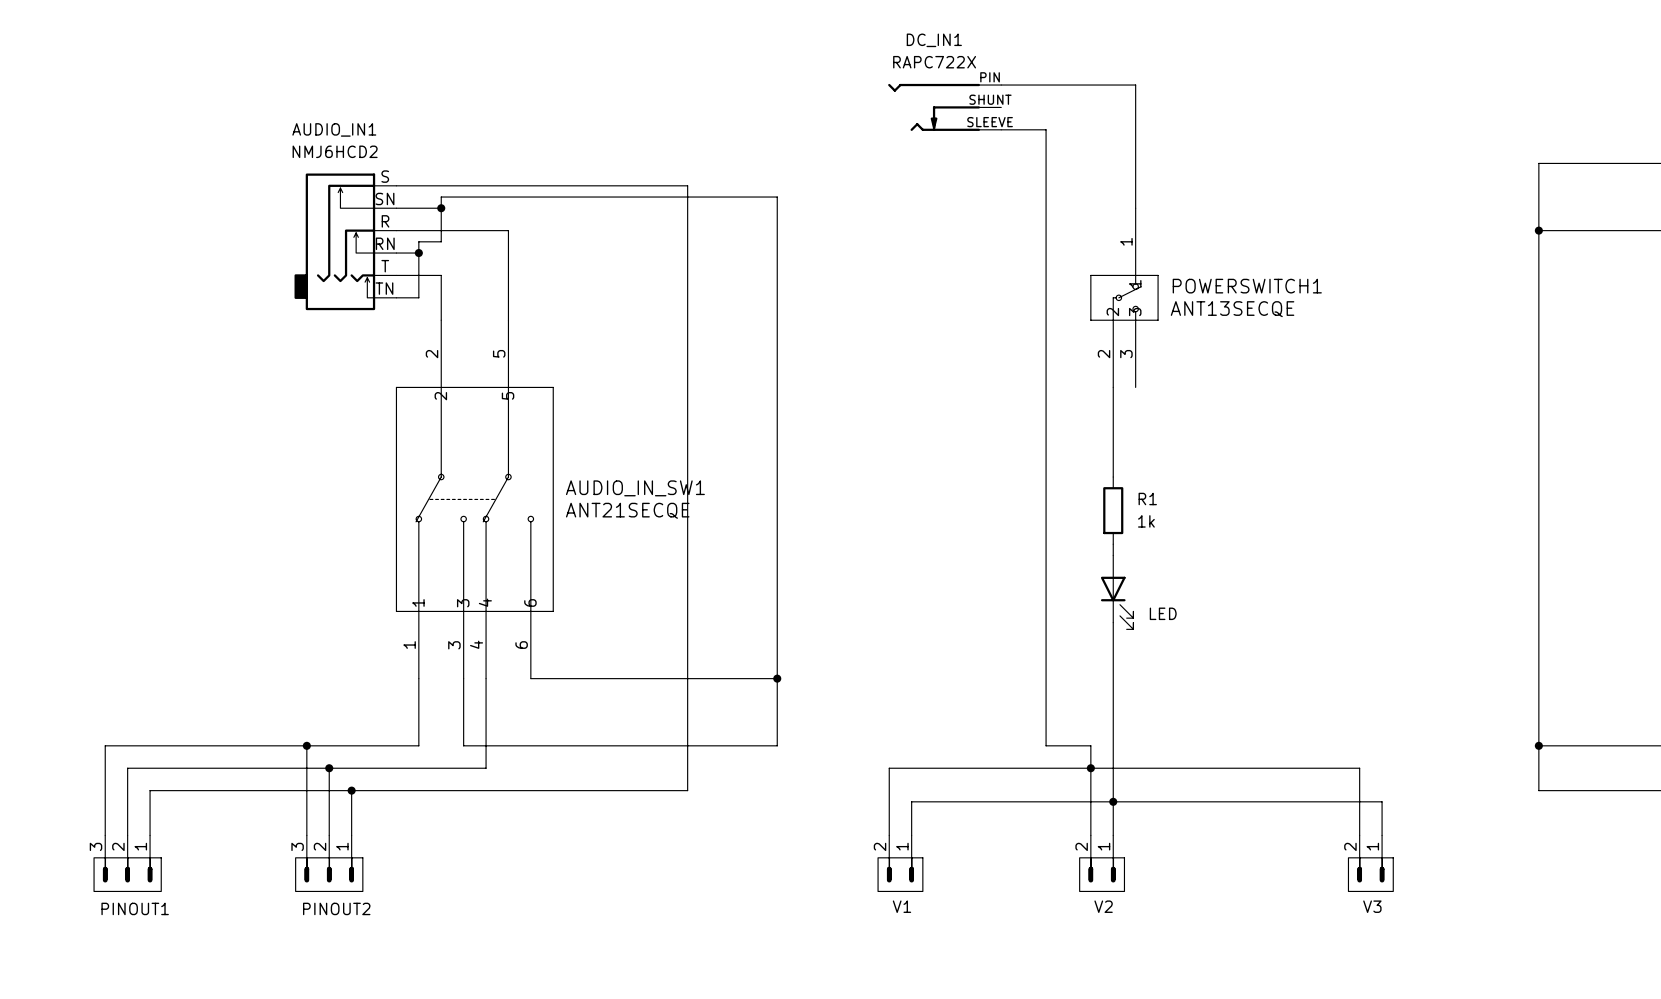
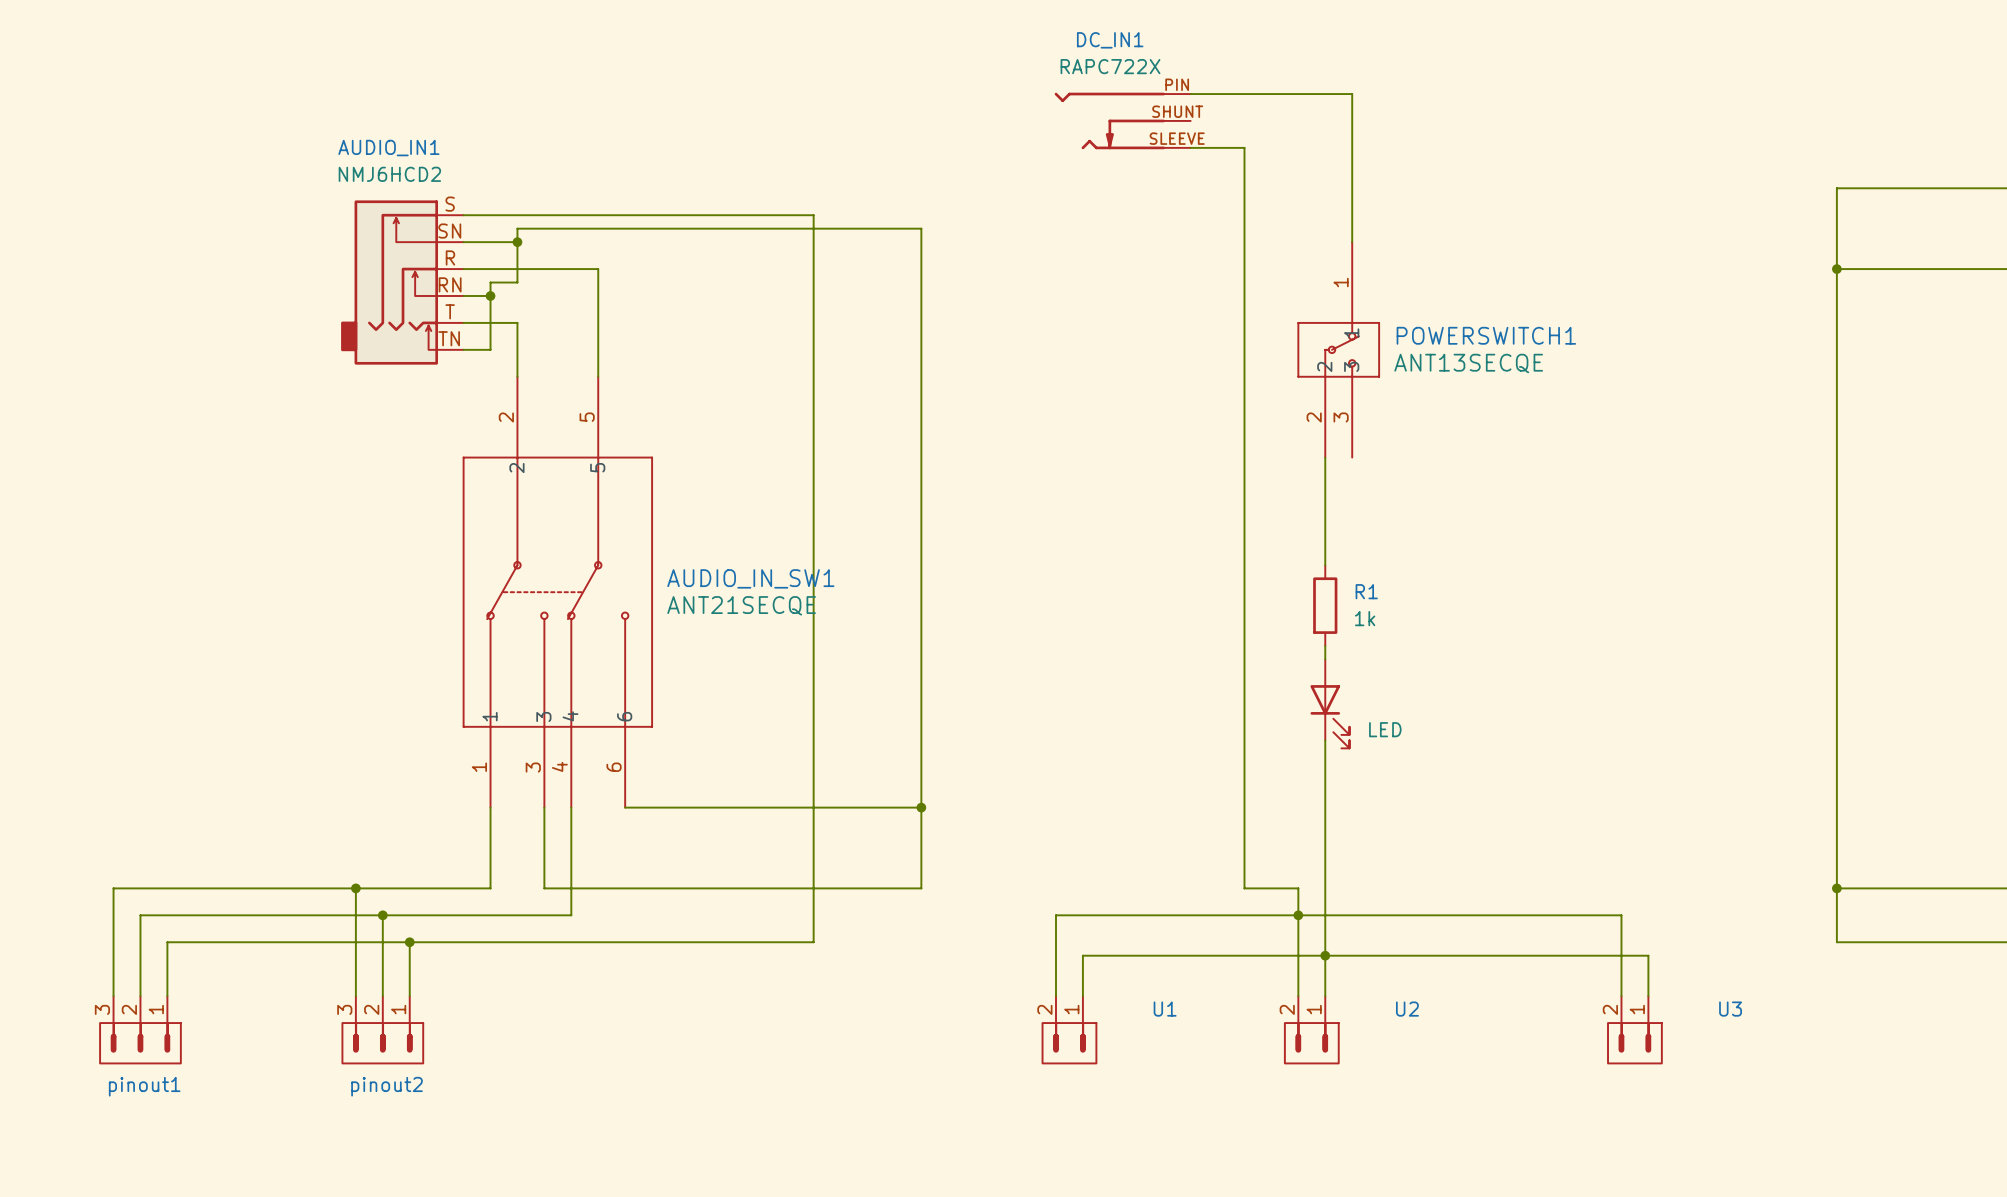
V1 name: V1 (901, 906) -> U1 (1165, 1009)
V2 name: V2 (1103, 906) -> U2 (1407, 1009)
V3 name: V3 (1372, 906) -> U3 (1730, 1009)
PINOUT1 name: PINOUT1 (135, 908) -> pinout1 (144, 1086)
PINOUT2 name: PINOUT2 (336, 908) -> pinout2 (387, 1086)

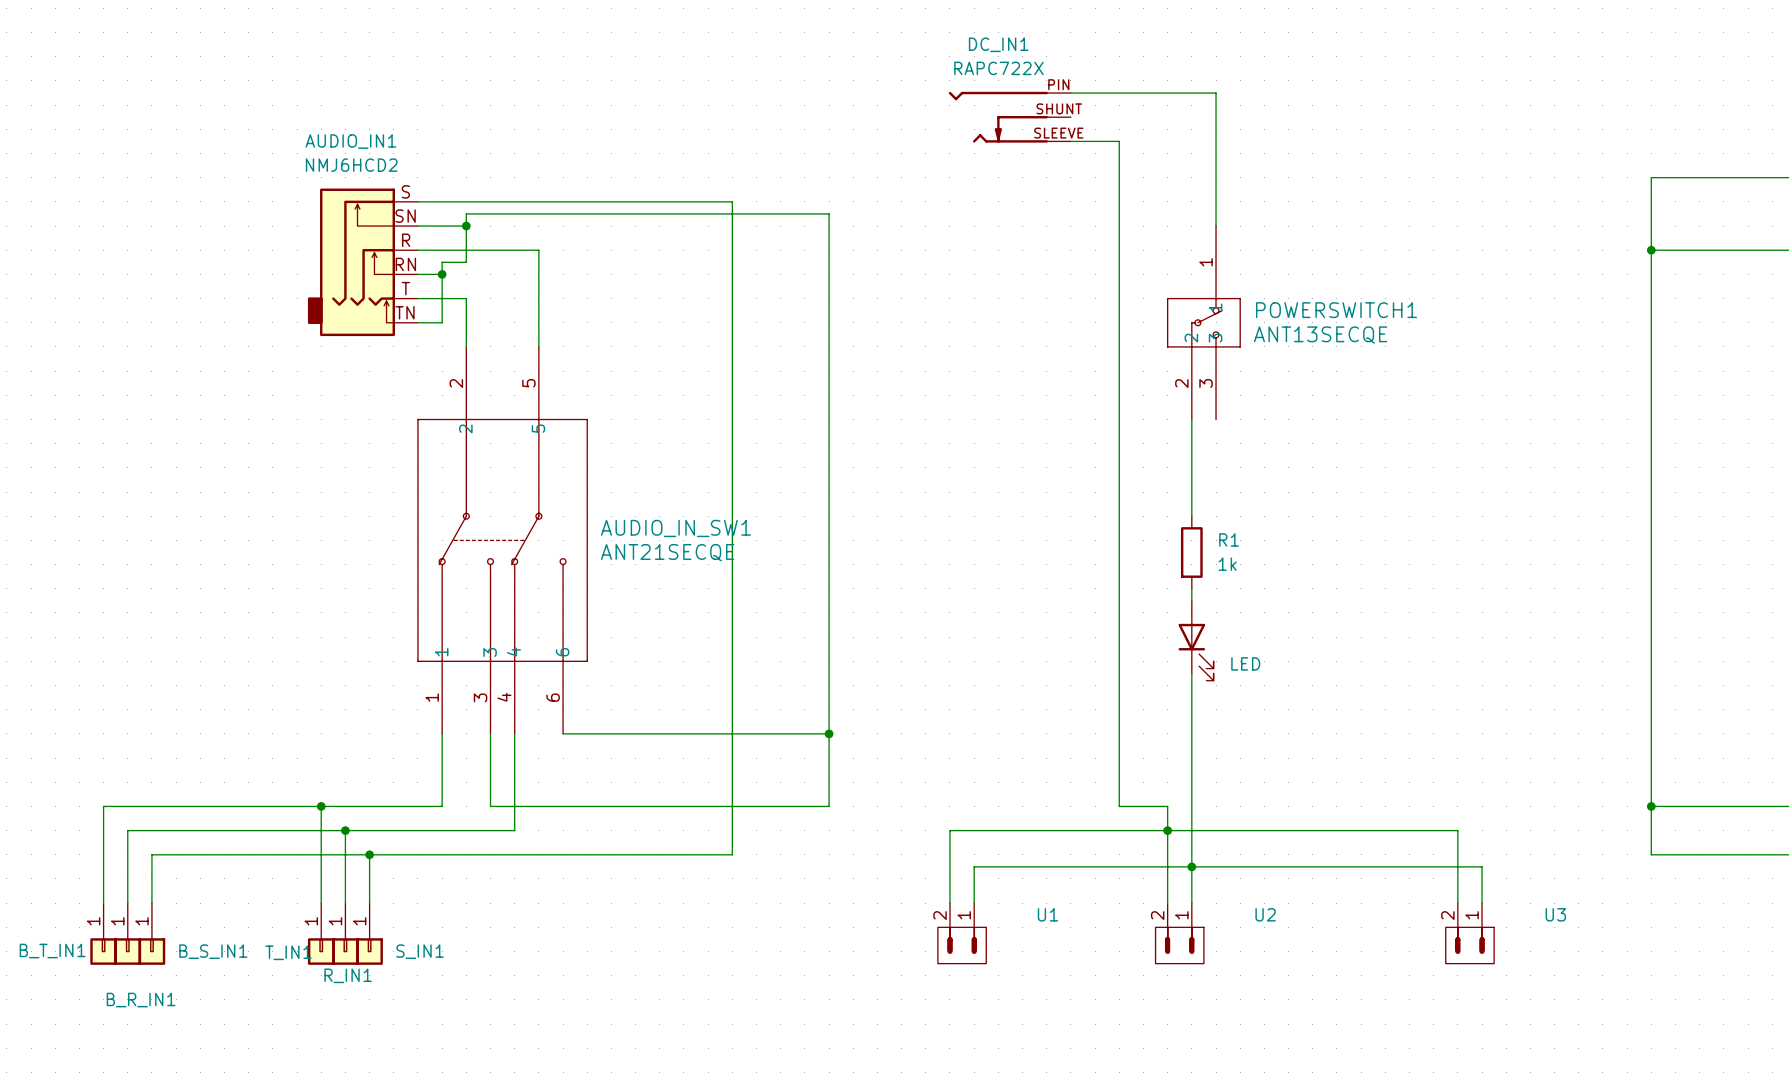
pinout1: (160, 1009) -> none
pinout2: (403, 1009) -> none
B_T_IN1: none -> (103, 934)
B_R_IN1: none -> (127, 934)
B_S_IN1: none -> (151, 934)
T_IN1: none -> (321, 934)
R_IN1: none -> (345, 934)
S_IN1: none -> (369, 934)

